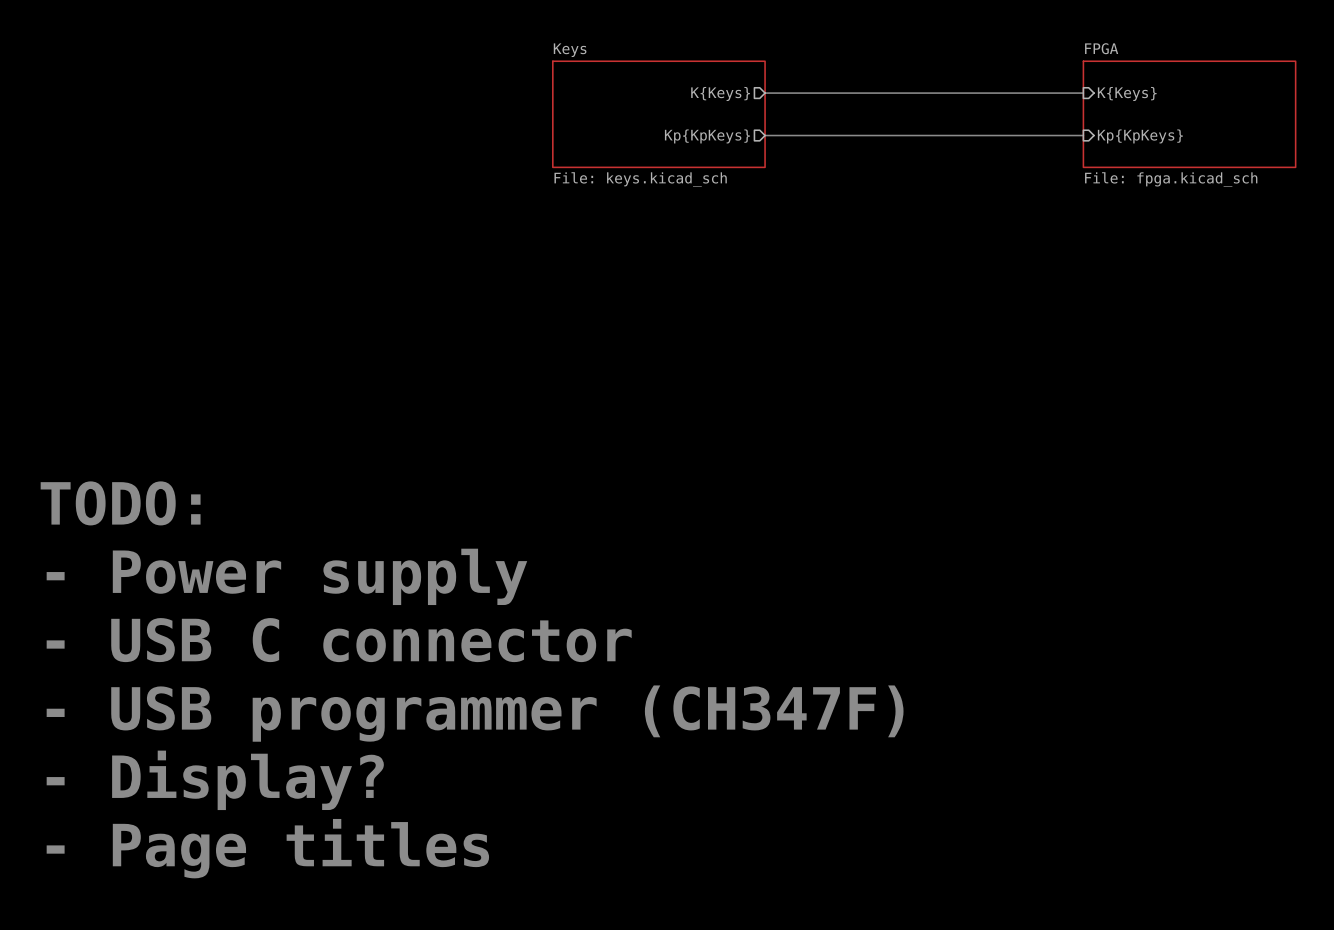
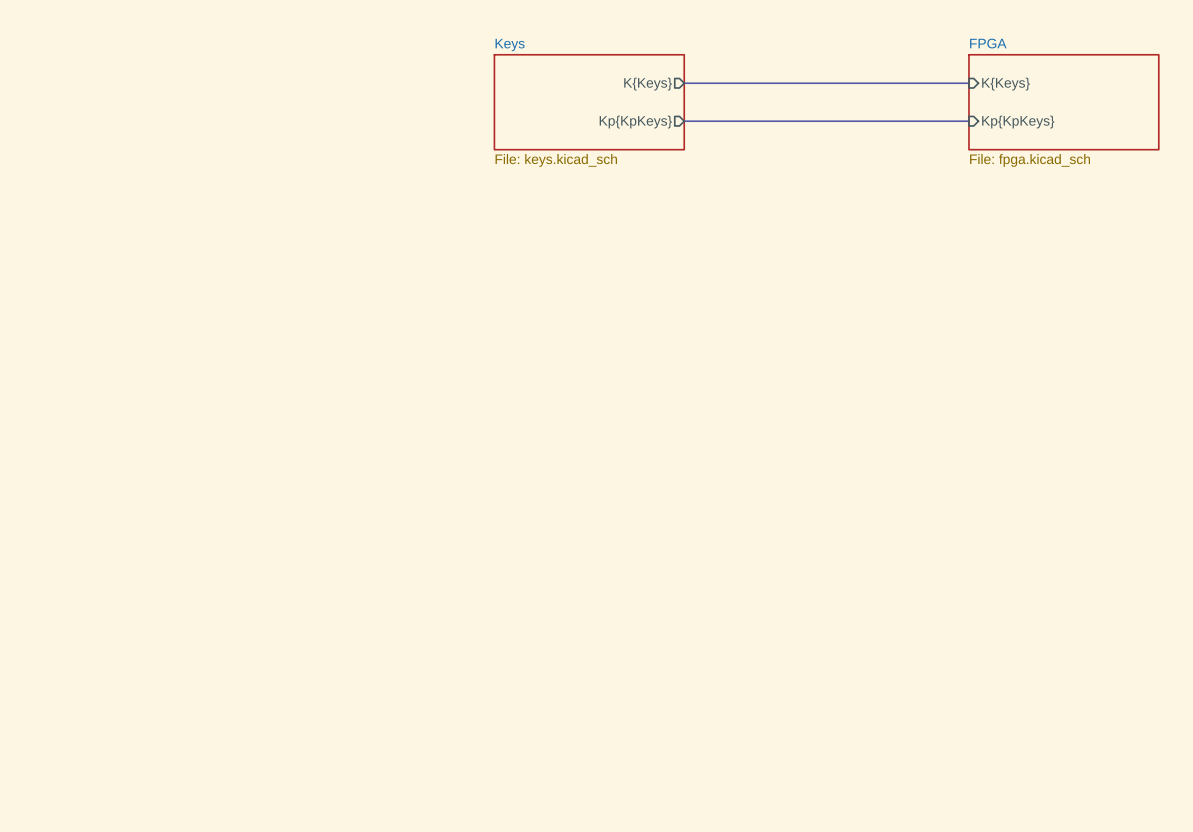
text: TODO: (120, 503) -> none
text: - Power supply (286, 576) -> none
text: - USB C connector (339, 640) -> none
text: - USB programmer (CH347F) (475, 713) -> none
text: - Display? (215, 780) -> none
text: - Page titles (267, 848) -> none

